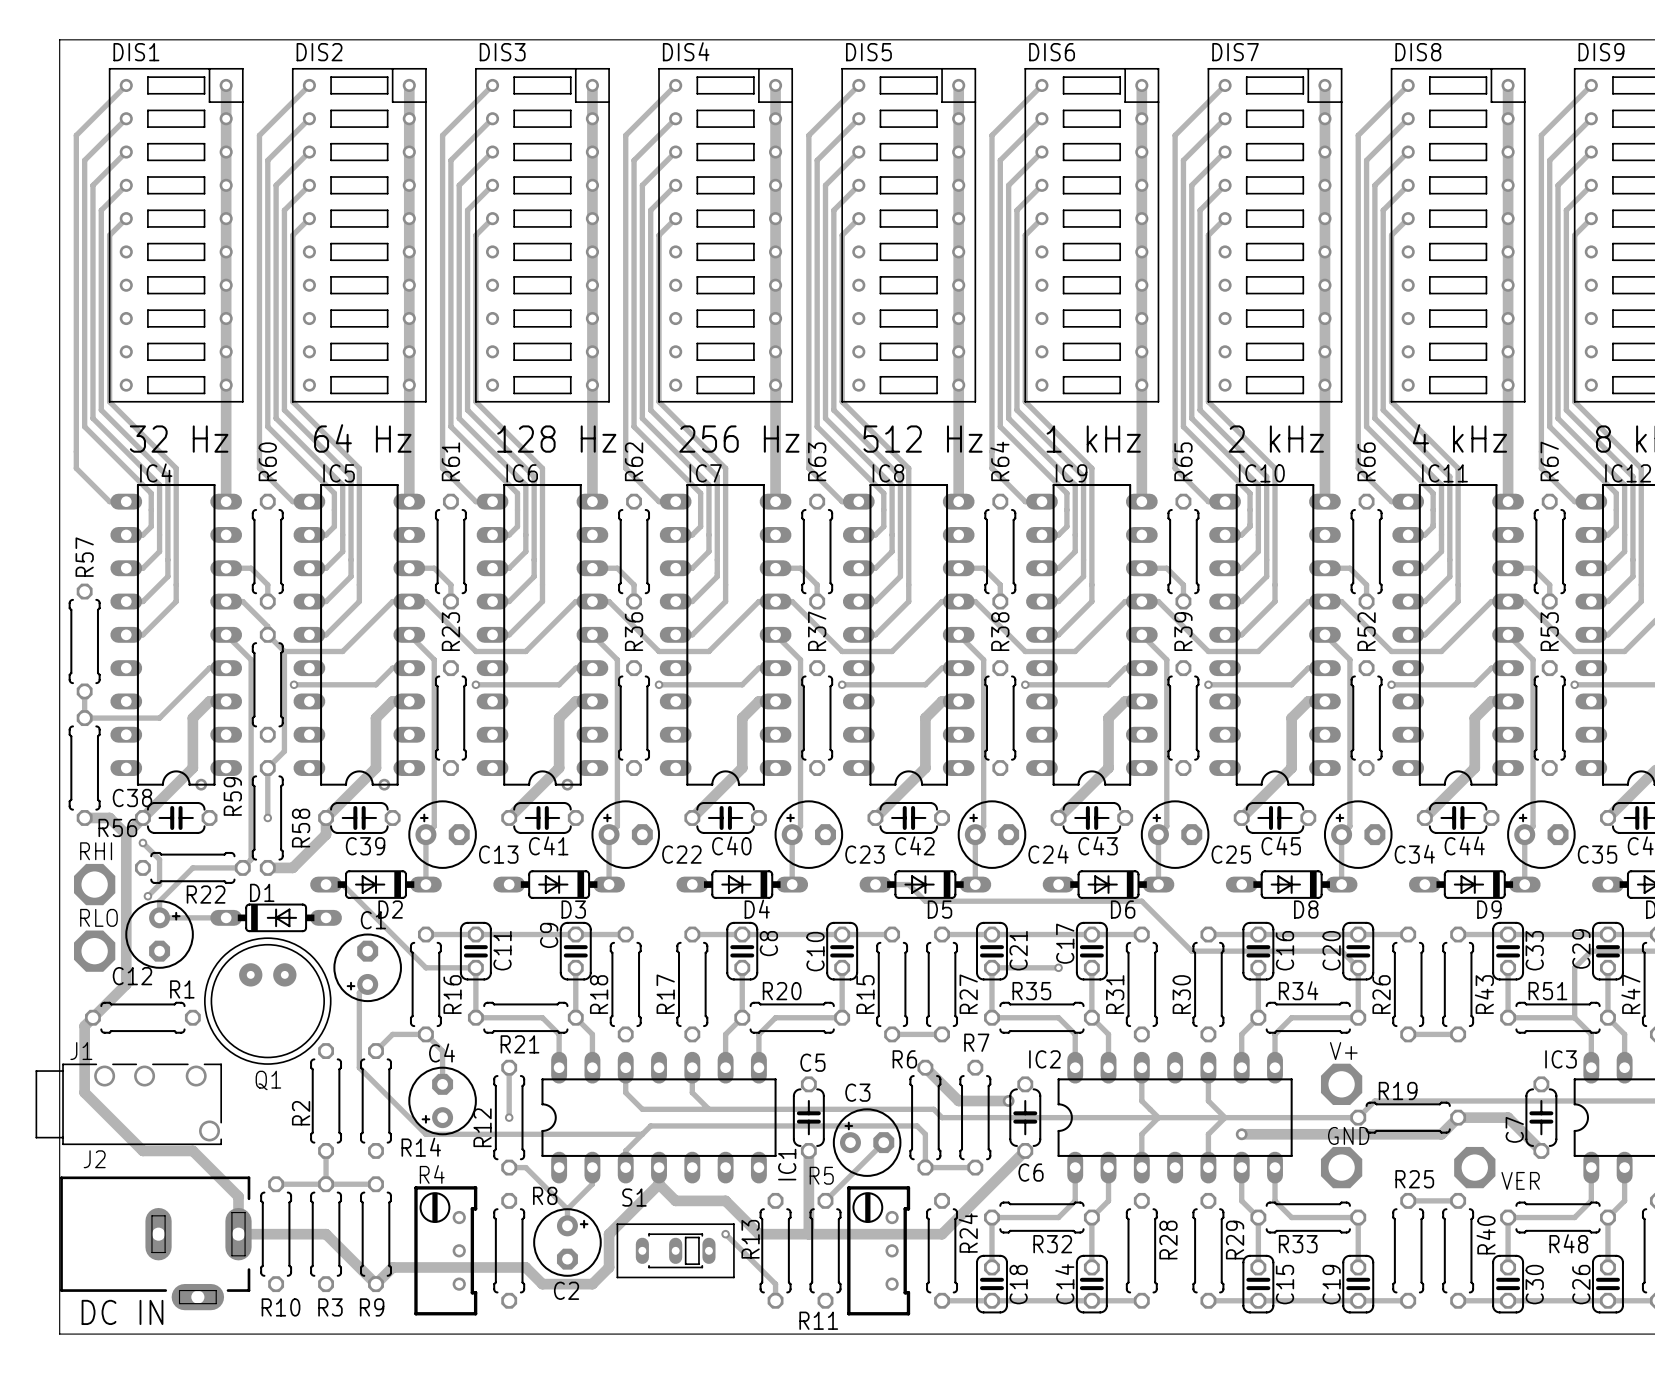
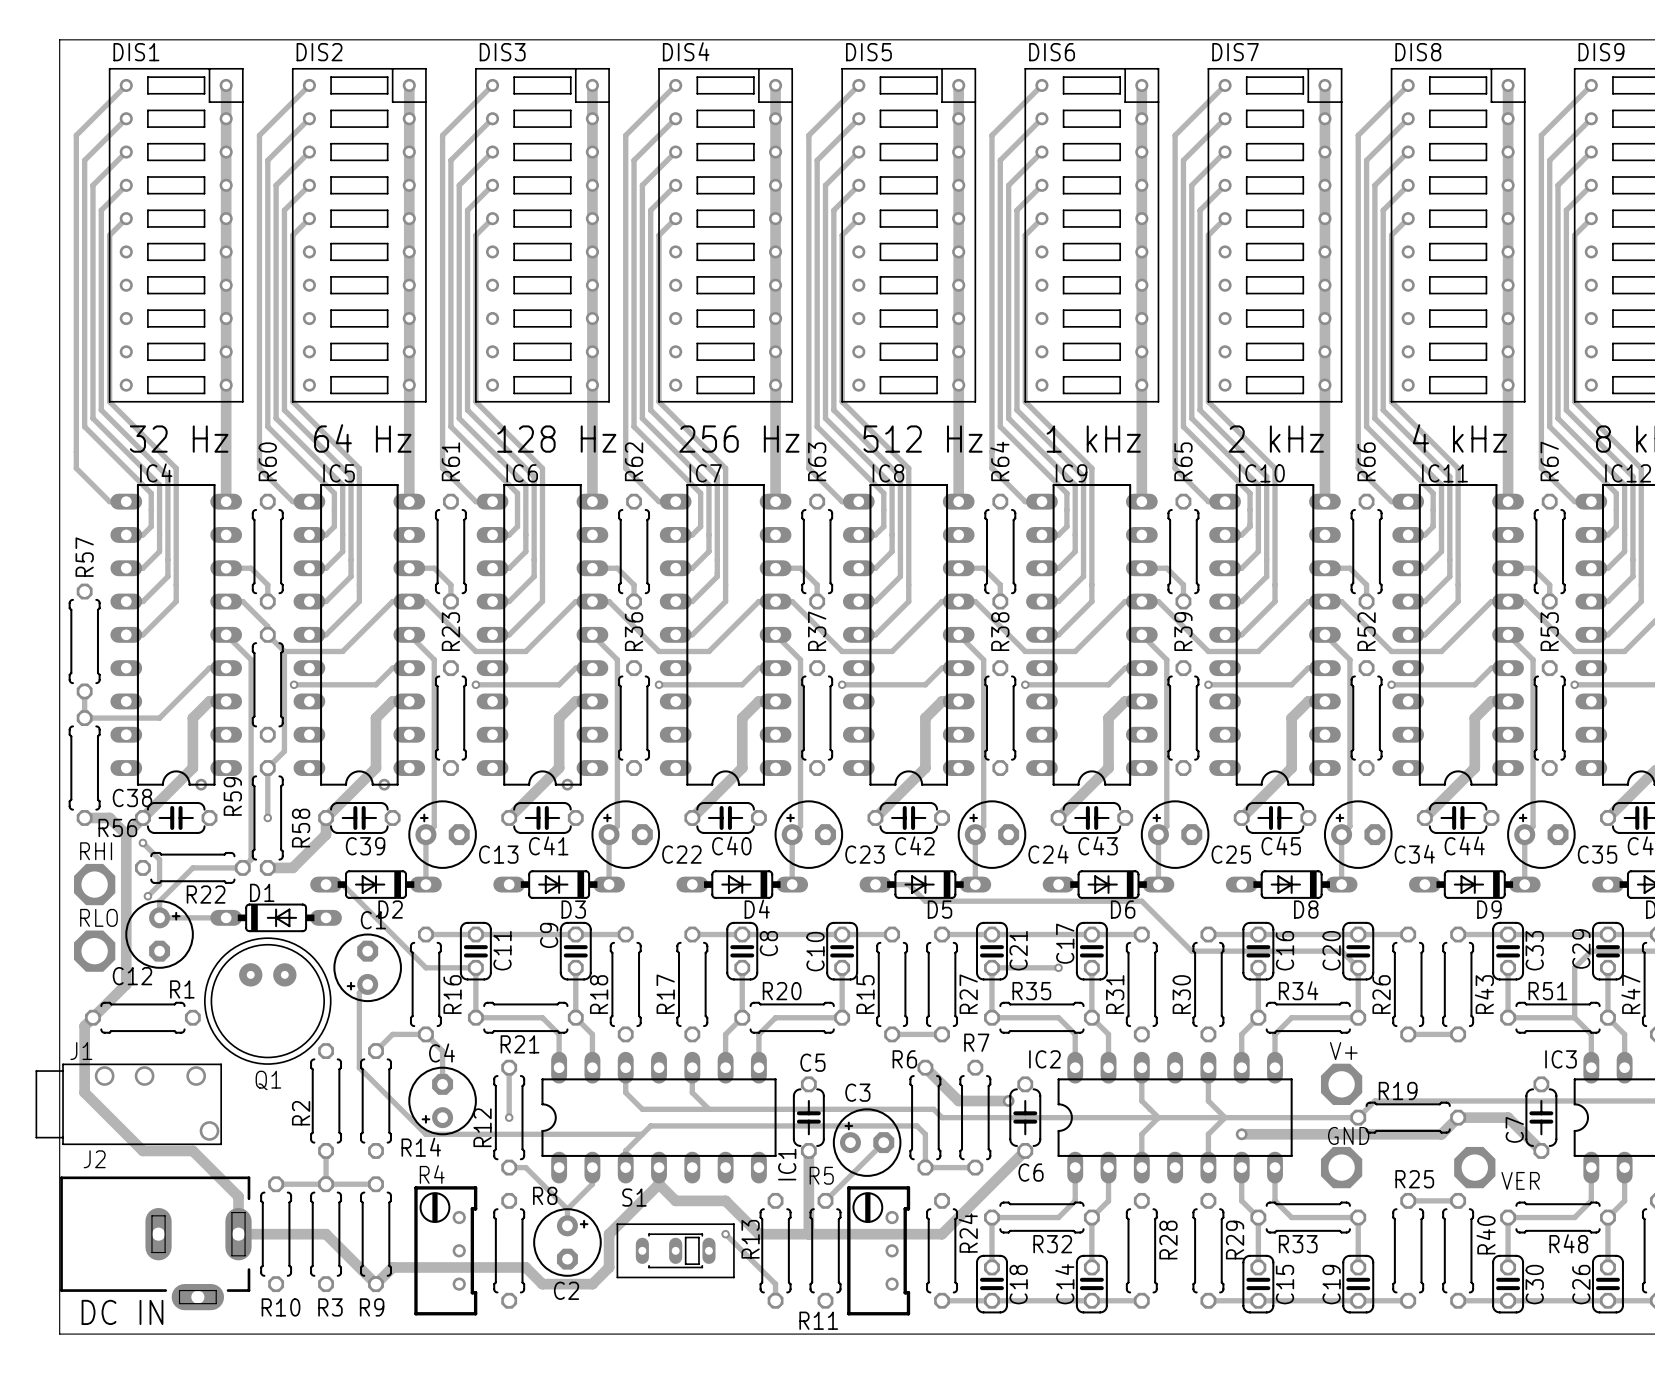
J1 footprint: [35, 1063, 223, 1146] -> [35, 1063, 223, 1146]

